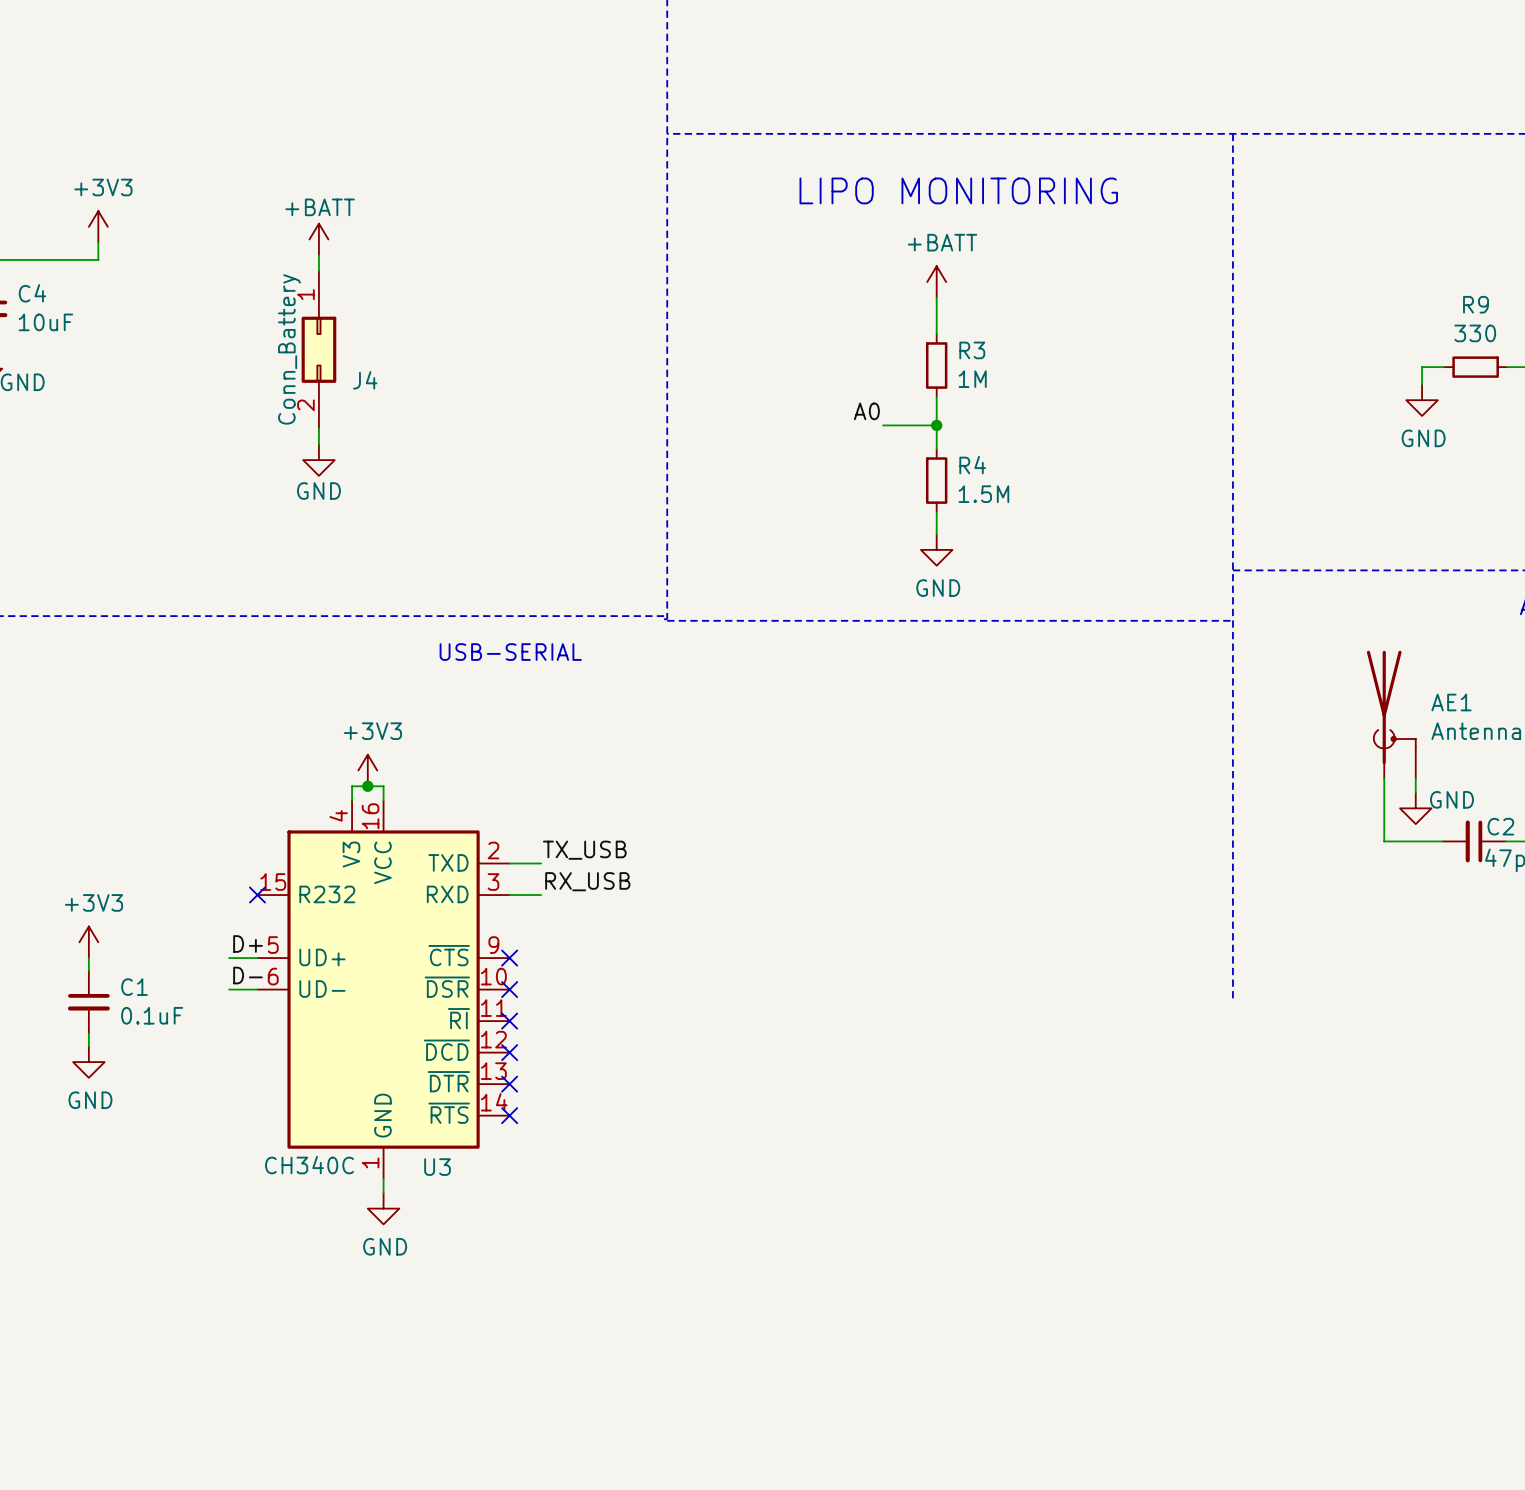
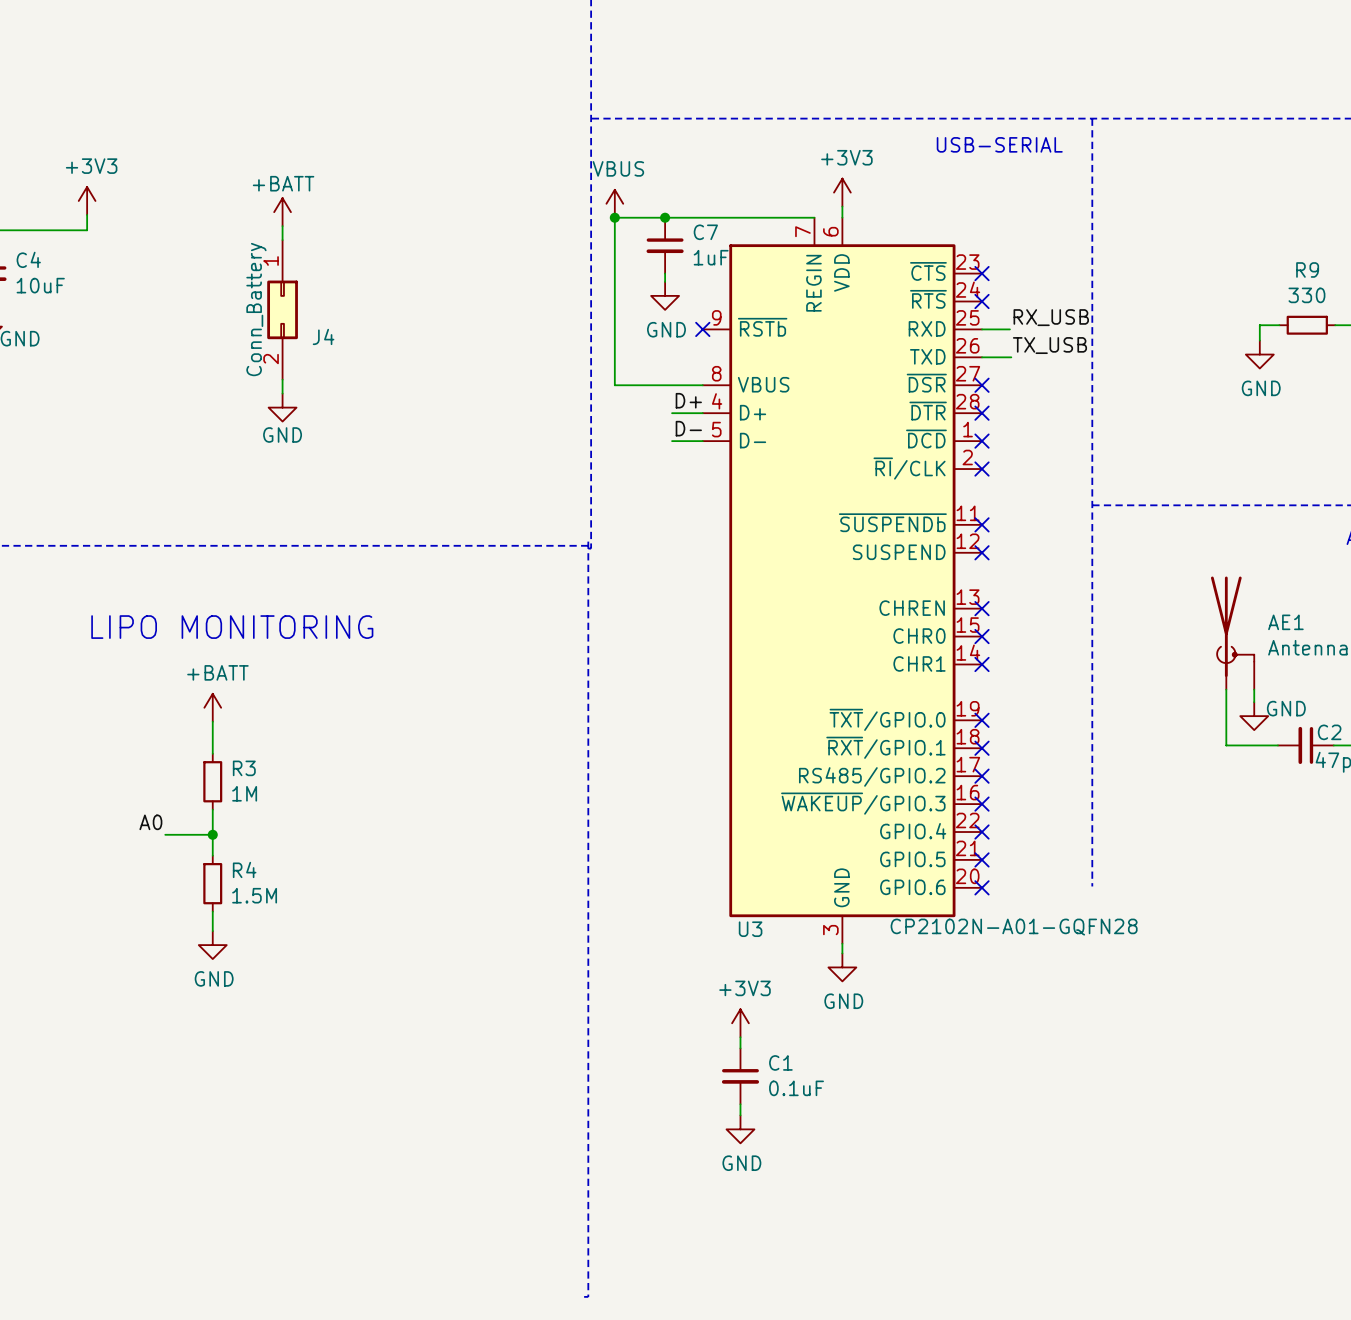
text: none -> USB-SERIAL (999, 144)
text: LIPO MONITORING (958, 190) -> none
power symbol: none -> +3V3 (842, 192)
power symbol: none -> VBUS (614, 203)
wire: none -> (842, 206) (842, 217)
junction: none -> (614, 217)
junction: none -> (665, 217)
wire: none -> (814, 217) (614, 217) (614, 385) (702, 385)
C7: none -> 1uF (665, 245)
power symbol: +BATT (936, 282) -> none
wire: none -> (665, 273) (665, 281)
no-connect mark: none -> (982, 273)
power symbol: none -> GND (665, 295)
no-connect mark: none -> (982, 301)
label: none -> RX_USB (1051, 317)
R3 position: (936, 365) -> (212, 781)
no-connect mark: none -> (702, 329)
wire: none -> (982, 329) (1009, 329)
label: none -> TX_USB (1049, 345)
wire: none -> (982, 357) (1011, 357)
label: A0 (866, 411) -> none
junction: (936, 425) -> none
no-connect mark: none -> (982, 385)
label: none -> D+ (688, 400)
wire: none -> (672, 413) (702, 413)
no-connect mark: none -> (982, 413)
R4 position: (936, 480) -> (212, 883)
label: none -> D- (688, 428)
wire: none -> (672, 441) (702, 441)
no-connect mark: none -> (982, 441)
no-connect mark: none -> (982, 469)
power symbol: GND (936, 549) -> none
no-connect mark: none -> (982, 524)
line: none -> (588, 541) (588, 1296) (584, 1296)
line: (667, 620) (1232, 620) -> none
no-connect mark: none -> (982, 552)
text: USB-SERIAL (510, 652) -> none
no-connect mark: none -> (982, 608)
text: none -> LIPO MONITORING (232, 627)
no-connect mark: none -> (982, 636)
no-connect mark: none -> (982, 664)
power symbol: +3V3 (367, 770) -> none
junction: (367, 786) -> none
power symbol: none -> +BATT (212, 707)
U3 symbol: [257, 800, 510, 1179] -> [702, 217, 983, 944]
wire: (352, 800) (352, 786) (383, 786) (383, 800) -> none
no-connect mark: none -> (982, 720)
wire: none -> (212, 721) (212, 753)
no-connect mark: none -> (982, 748)
label: TX_USB (584, 850) -> none
wire: (509, 863) (541, 863) -> none
no-connect mark: none -> (982, 776)
label: RX_USB (587, 881) -> none
no-connect mark: (257, 895) -> none
wire: (509, 895) (541, 895) -> none
no-connect mark: none -> (982, 804)
wire: none -> (212, 809) (212, 855)
label: none -> A0 (150, 822)
no-connect mark: none -> (982, 832)
power symbol: +3V3 (88, 942) -> none
wire: none -> (165, 834) (212, 834)
junction: none -> (212, 834)
label: D+ (248, 943) -> none
wire: (88, 958) (88, 970) -> none
wire: (229, 958) (257, 958) -> none
no-connect mark: (509, 958) -> none
no-connect mark: none -> (982, 859)
label: D- (248, 975) -> none
wire: (229, 989) (257, 989) -> none
no-connect mark: (509, 989) -> none
C1 position: (88, 1002) -> (740, 1076)
no-connect mark: none -> (982, 887)
no-connect mark: (509, 1021) -> none
wire: none -> (212, 911) (212, 931)
wire: (88, 1033) (88, 1046) -> none
no-connect mark: (509, 1052) -> none
power symbol: GND (88, 1062) -> none
wire: none -> (842, 943) (842, 953)
power symbol: none -> GND (212, 945)
no-connect mark: (509, 1084) -> none
power symbol: none -> GND (842, 967)
no-connect mark: (509, 1115) -> none
power symbol: none -> +3V3 (740, 1023)
U3 value: CH340C (309, 1165) -> CP2102N-A01-GQFN28 (1014, 927)
U3 name position: U3 (437, 1167) -> U3 (750, 929)
wire: none -> (740, 1037) (740, 1048)
wire: (383, 1178) (383, 1192) -> none
power symbol: GND (383, 1208) -> none
wire: none -> (740, 1104) (740, 1115)
power symbol: none -> GND (740, 1129)

